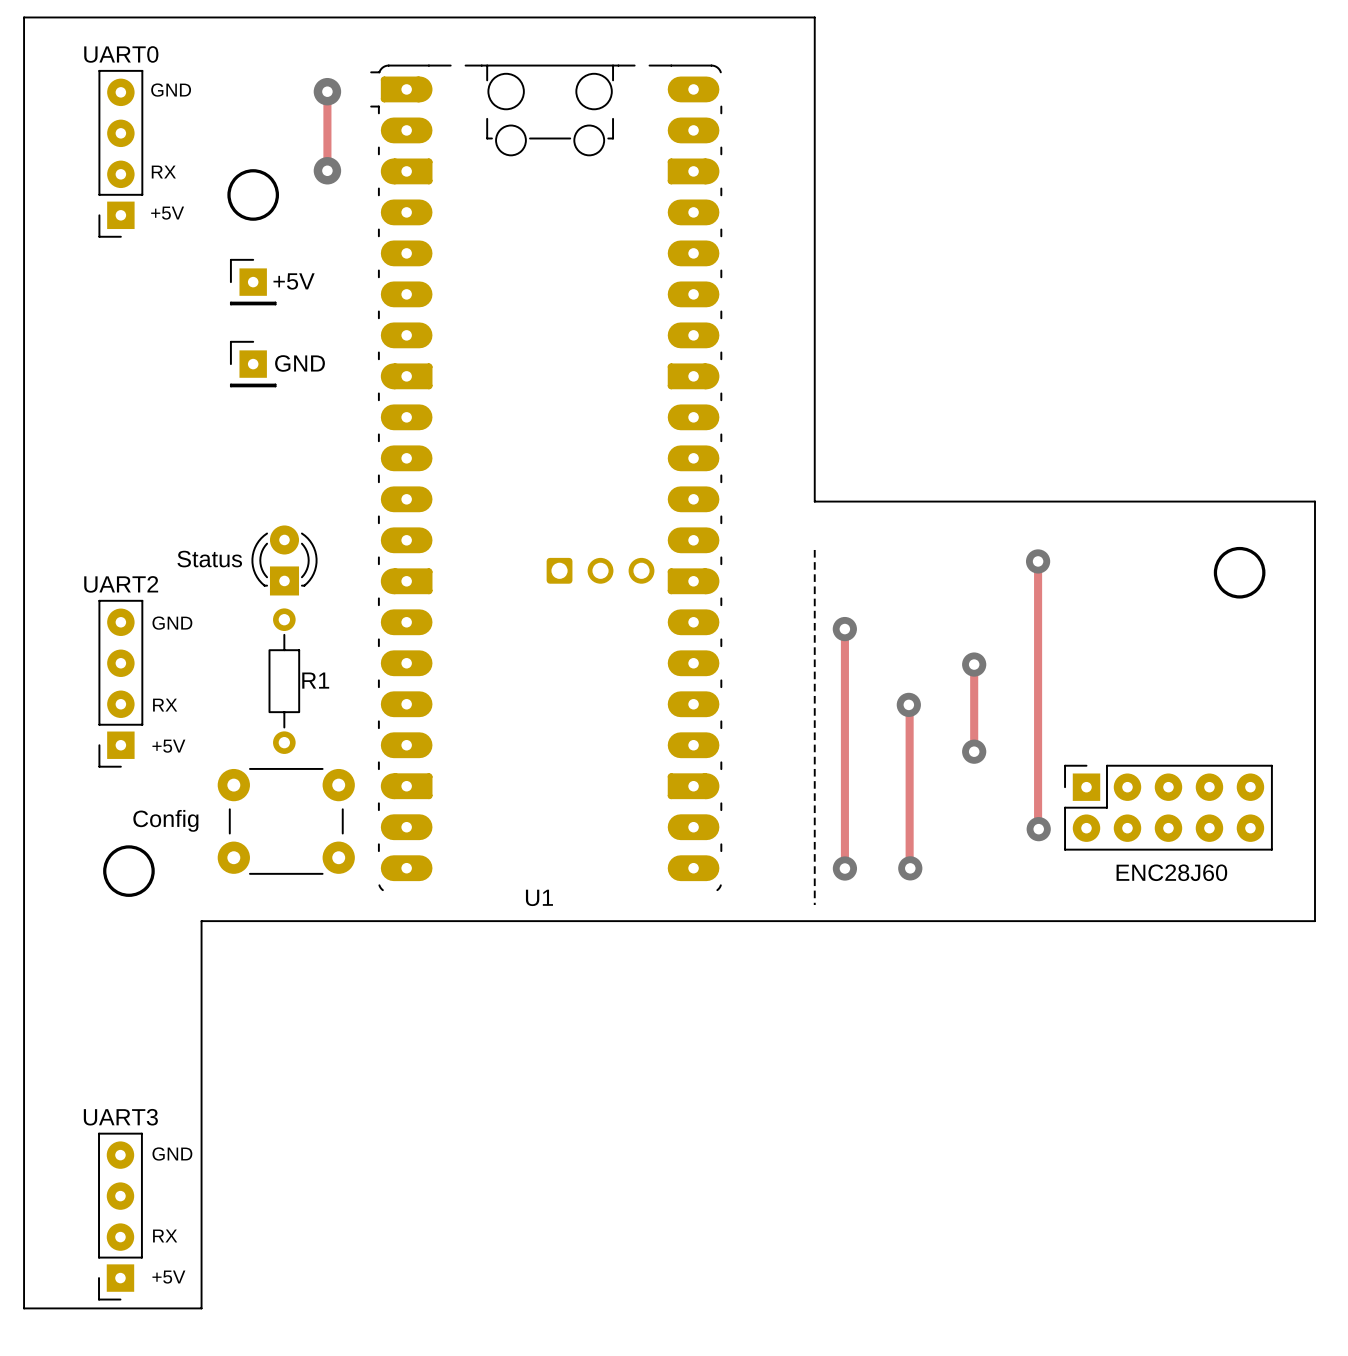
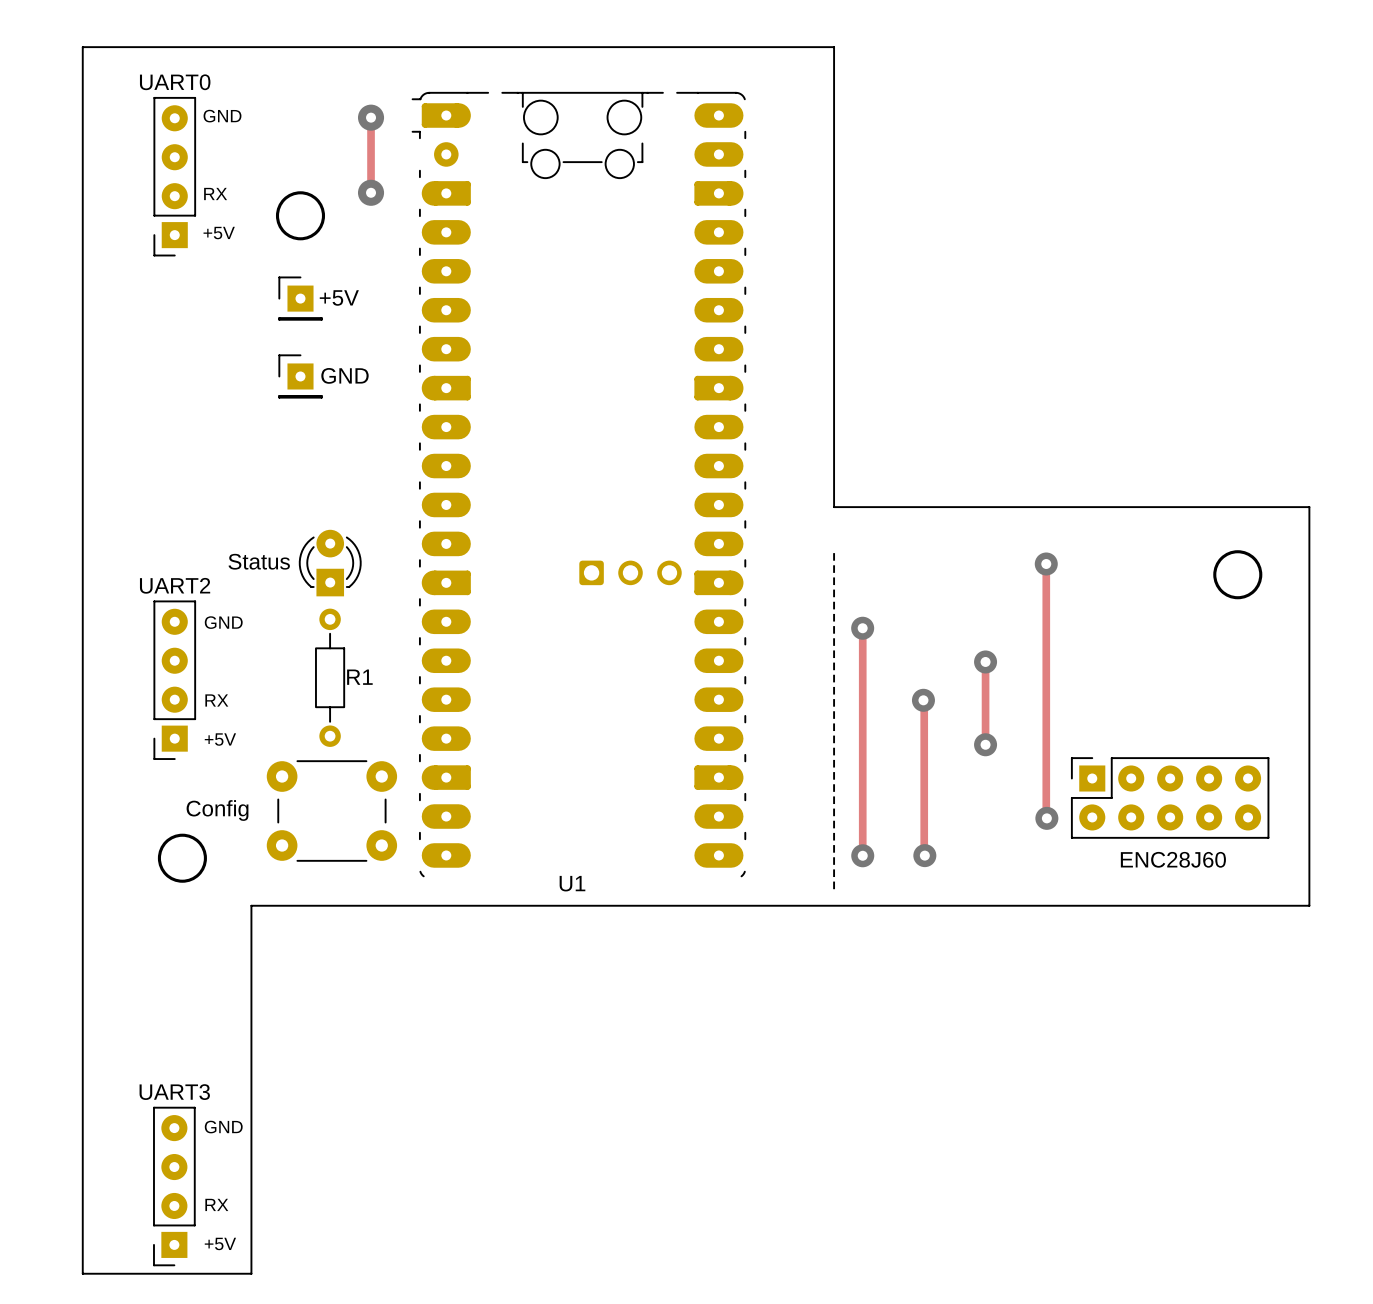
U1 footprint: [370, 64, 723, 892] -> [411, 91, 747, 878]

